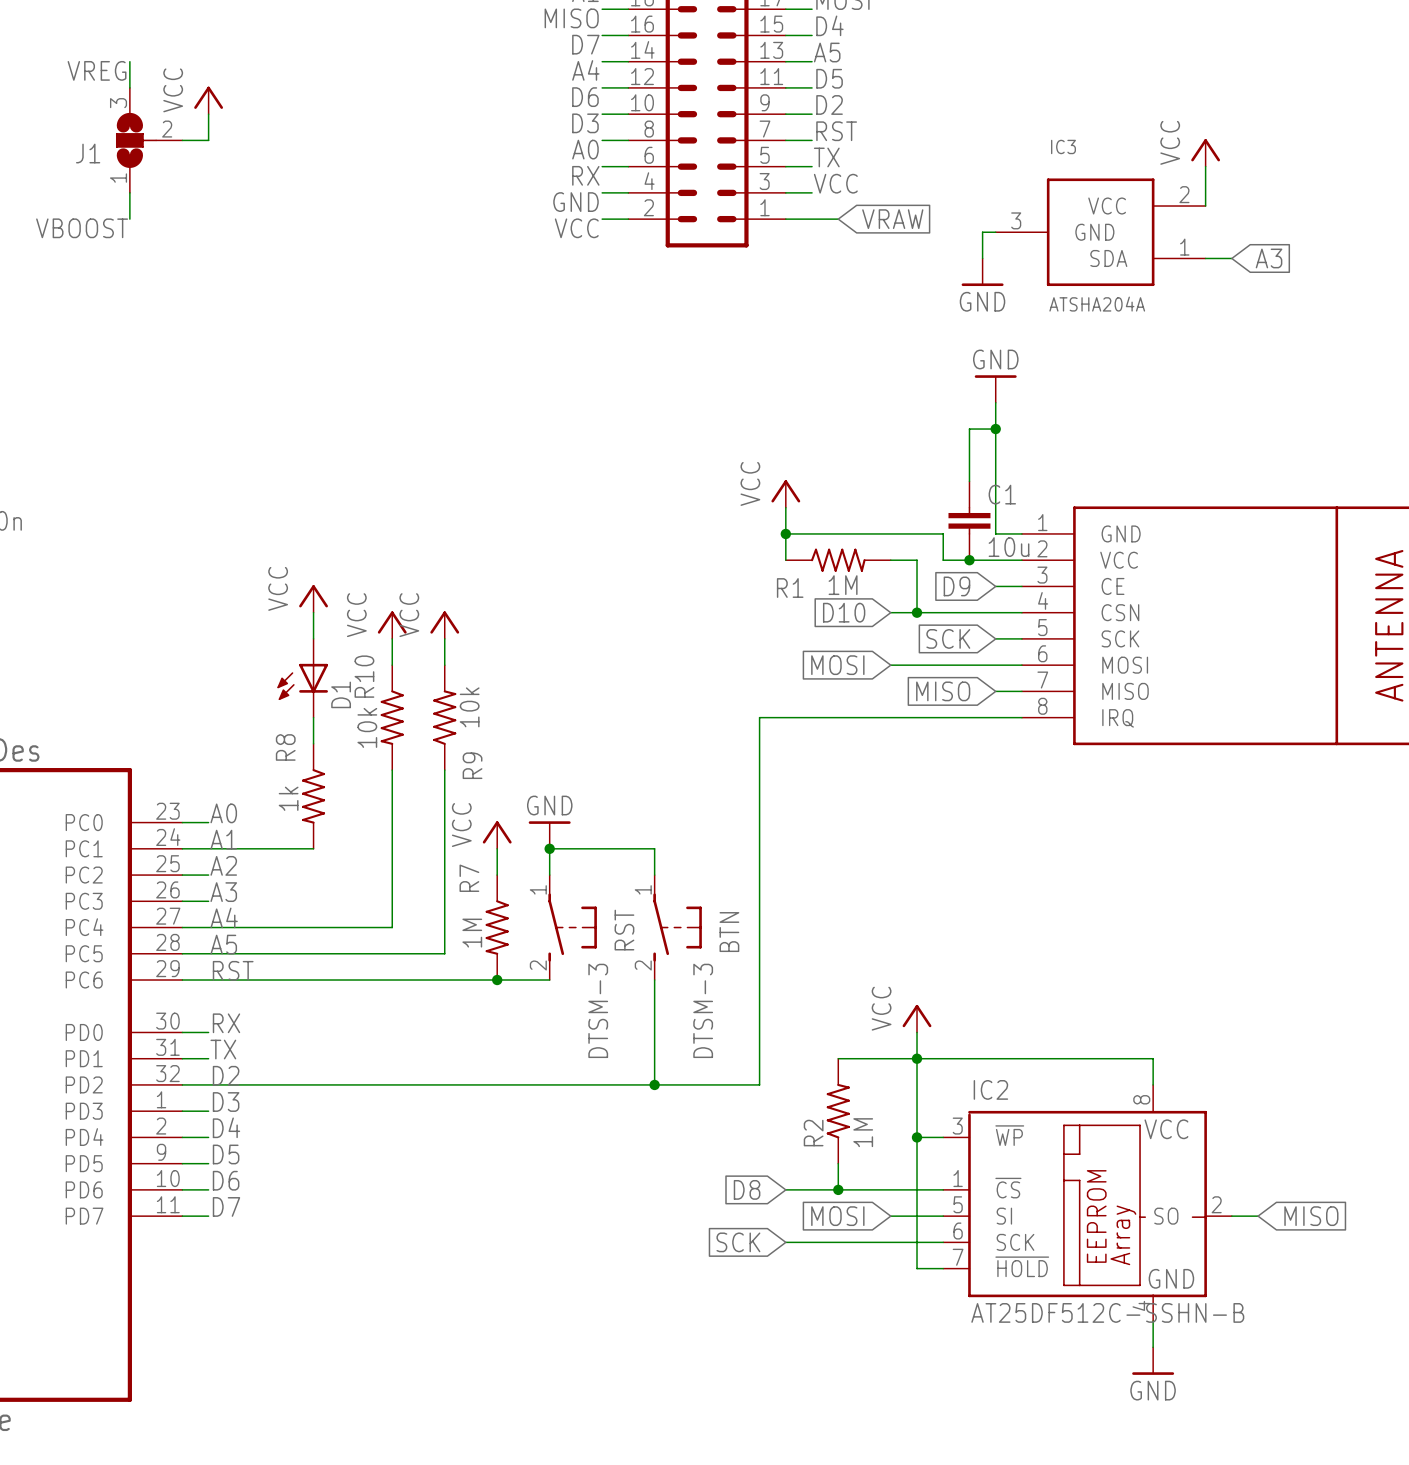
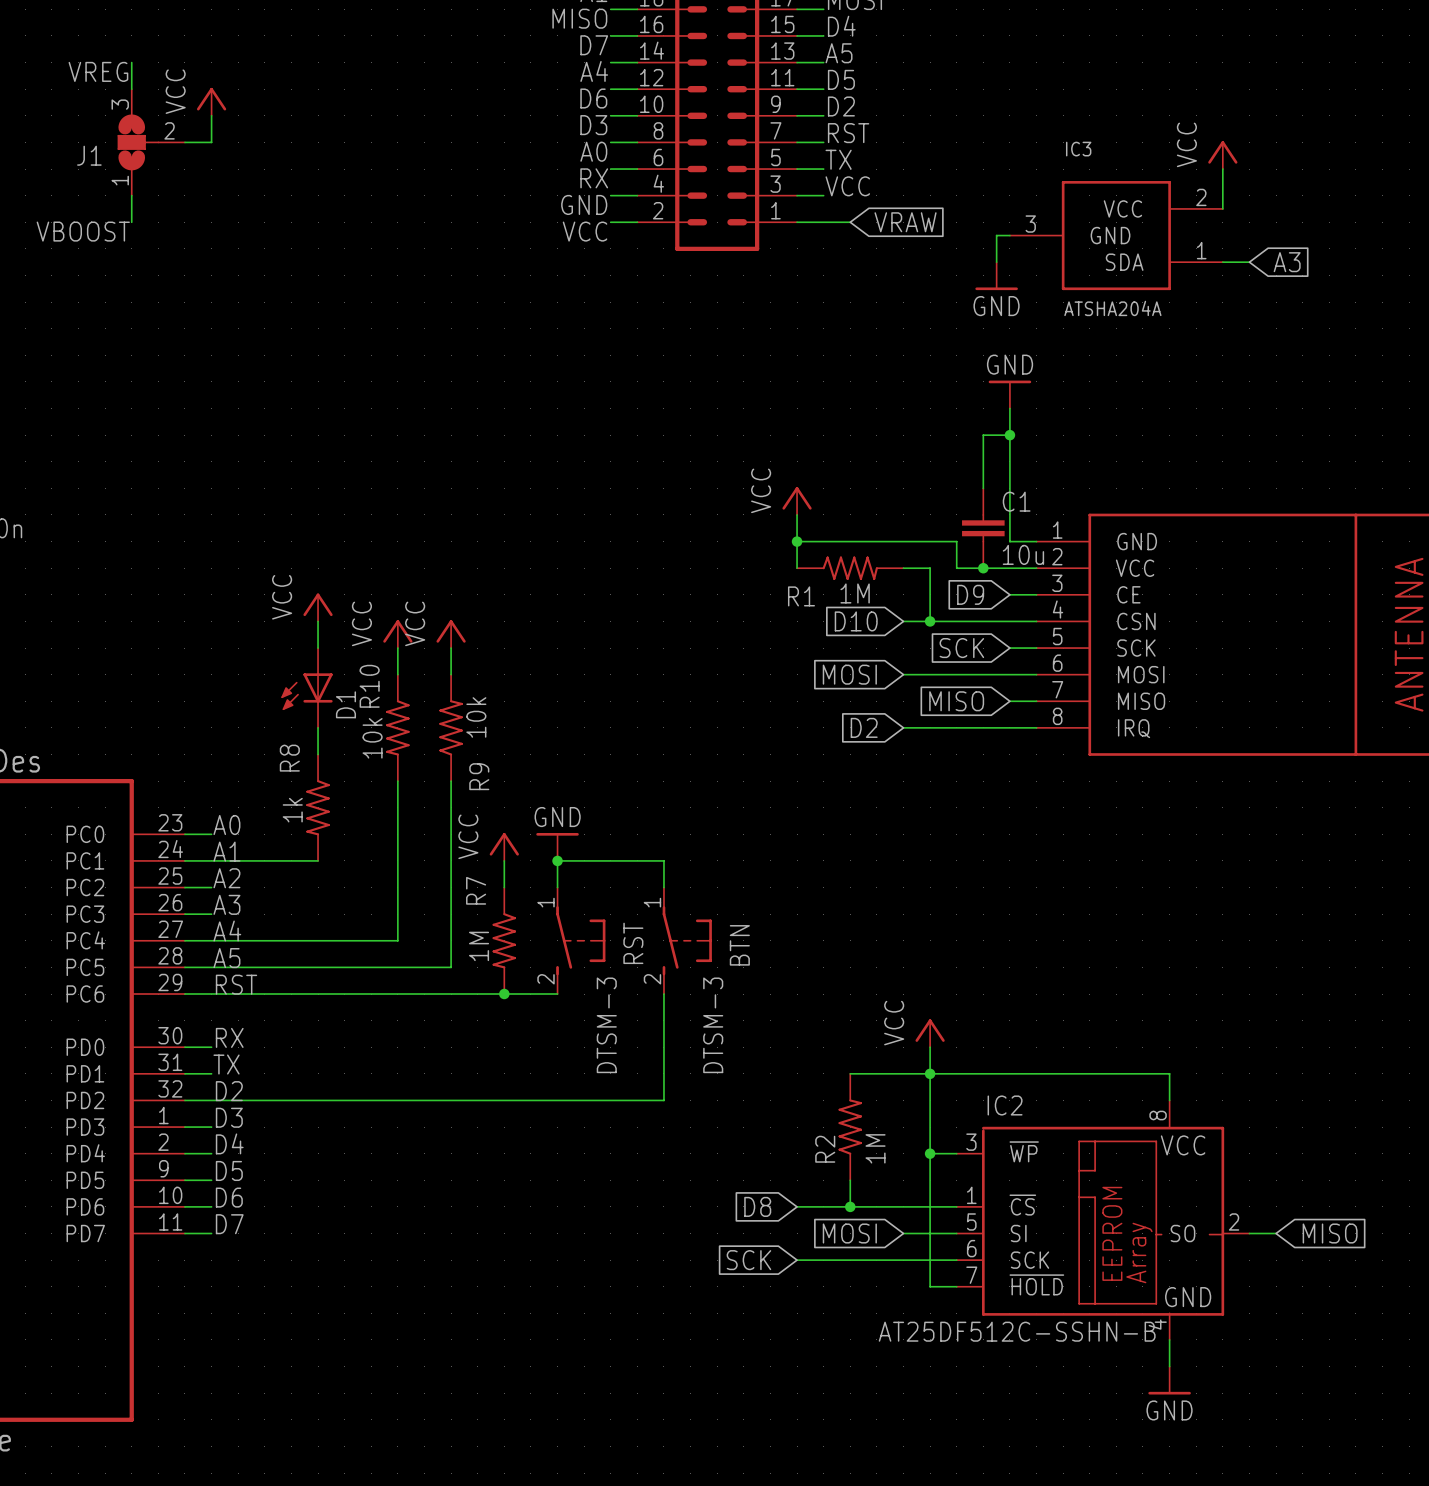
global label: none -> D2 (864, 727)
wire: (890, 717) (759, 717) (759, 1084) (654, 1084) -> none
junction: (654, 1084) -> none
IC2 value position: AT25DF512C-SSHN-B (1107, 1312) -> AT25DF512C-SSHN-B (1017, 1331)

